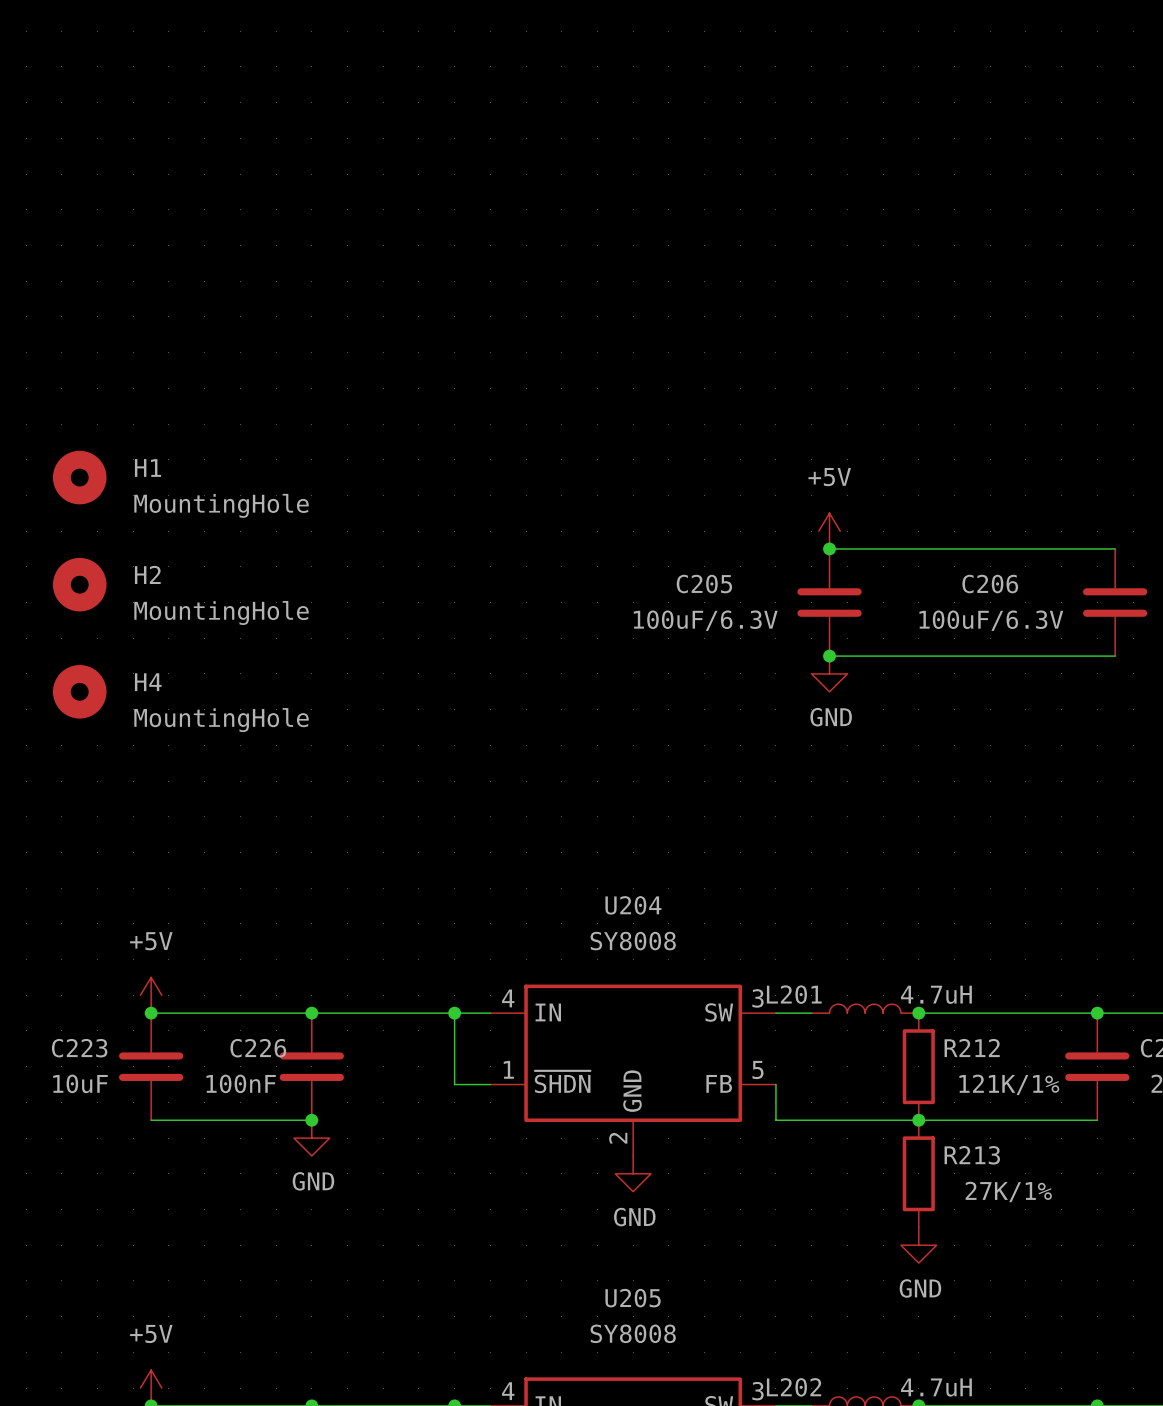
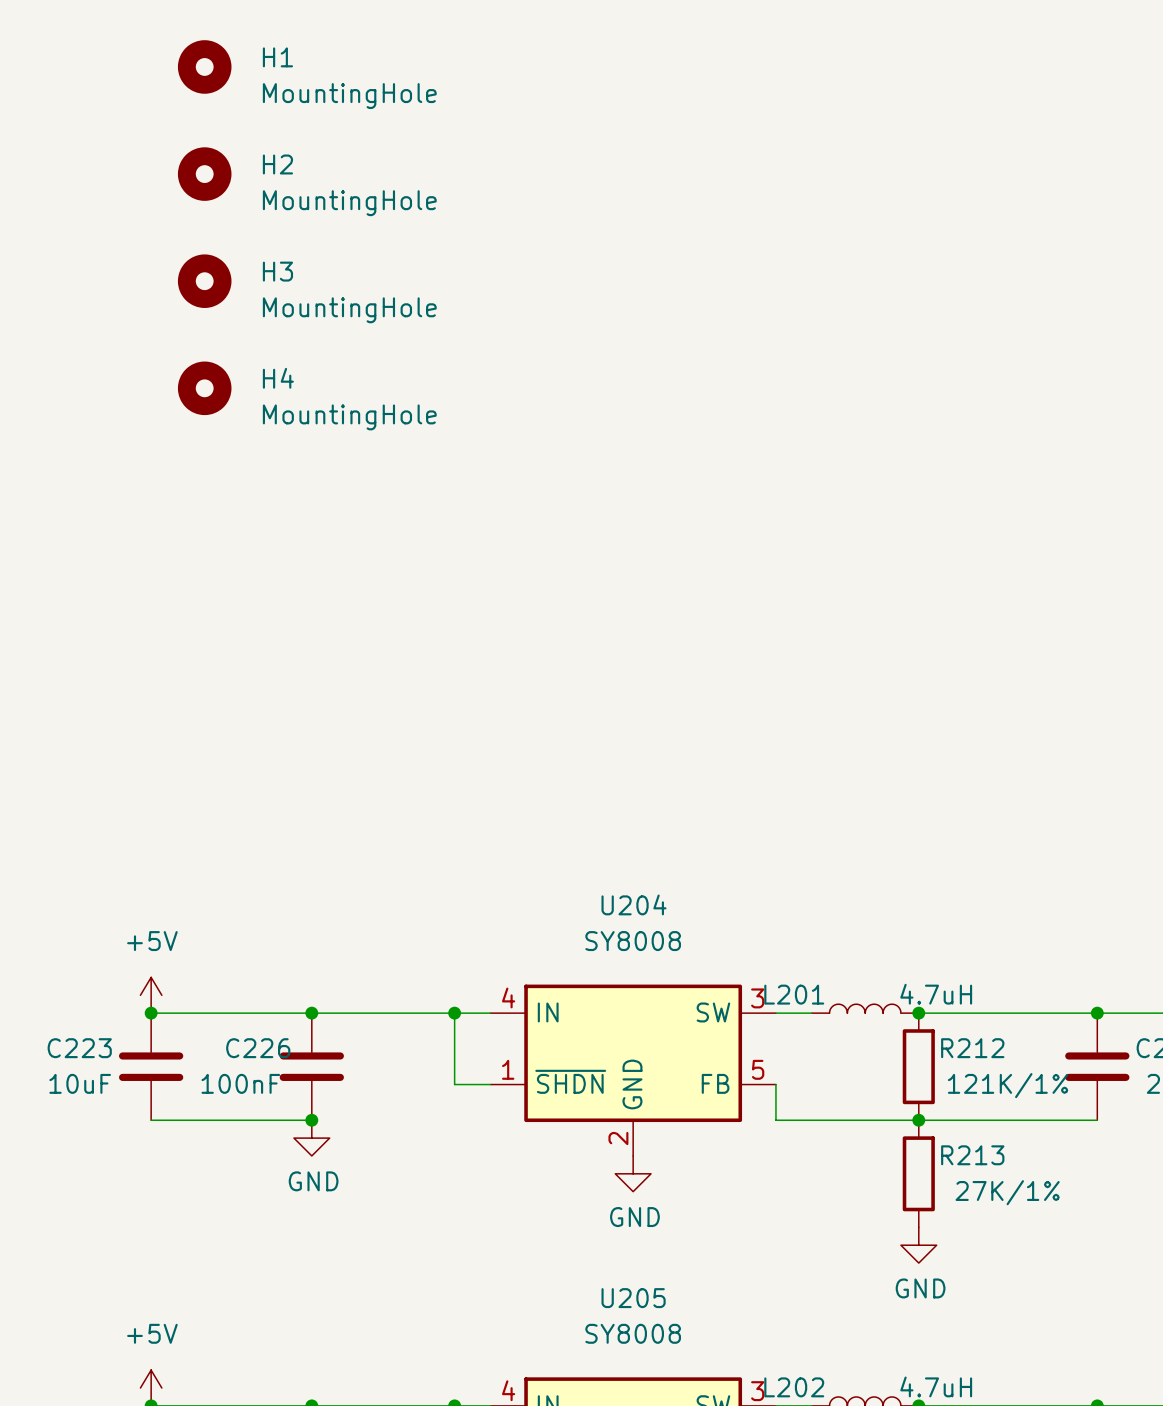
H3: none -> MountingHole (204, 281)
H1 position: (79, 477) -> (204, 66)
power symbol: +5V (829, 531) -> none
wire: (829, 548) (1115, 548) -> none
junction: (829, 548) -> none
H2 position: (79, 584) -> (204, 174)
C205: 100uF/6.3V (829, 602) -> none
C206: 100uF/6.3V (1115, 602) -> none
wire: (829, 656) (1115, 656) -> none
junction: (829, 656) -> none
power symbol: GND (829, 673) -> none
H4 position: (79, 691) -> (204, 388)

